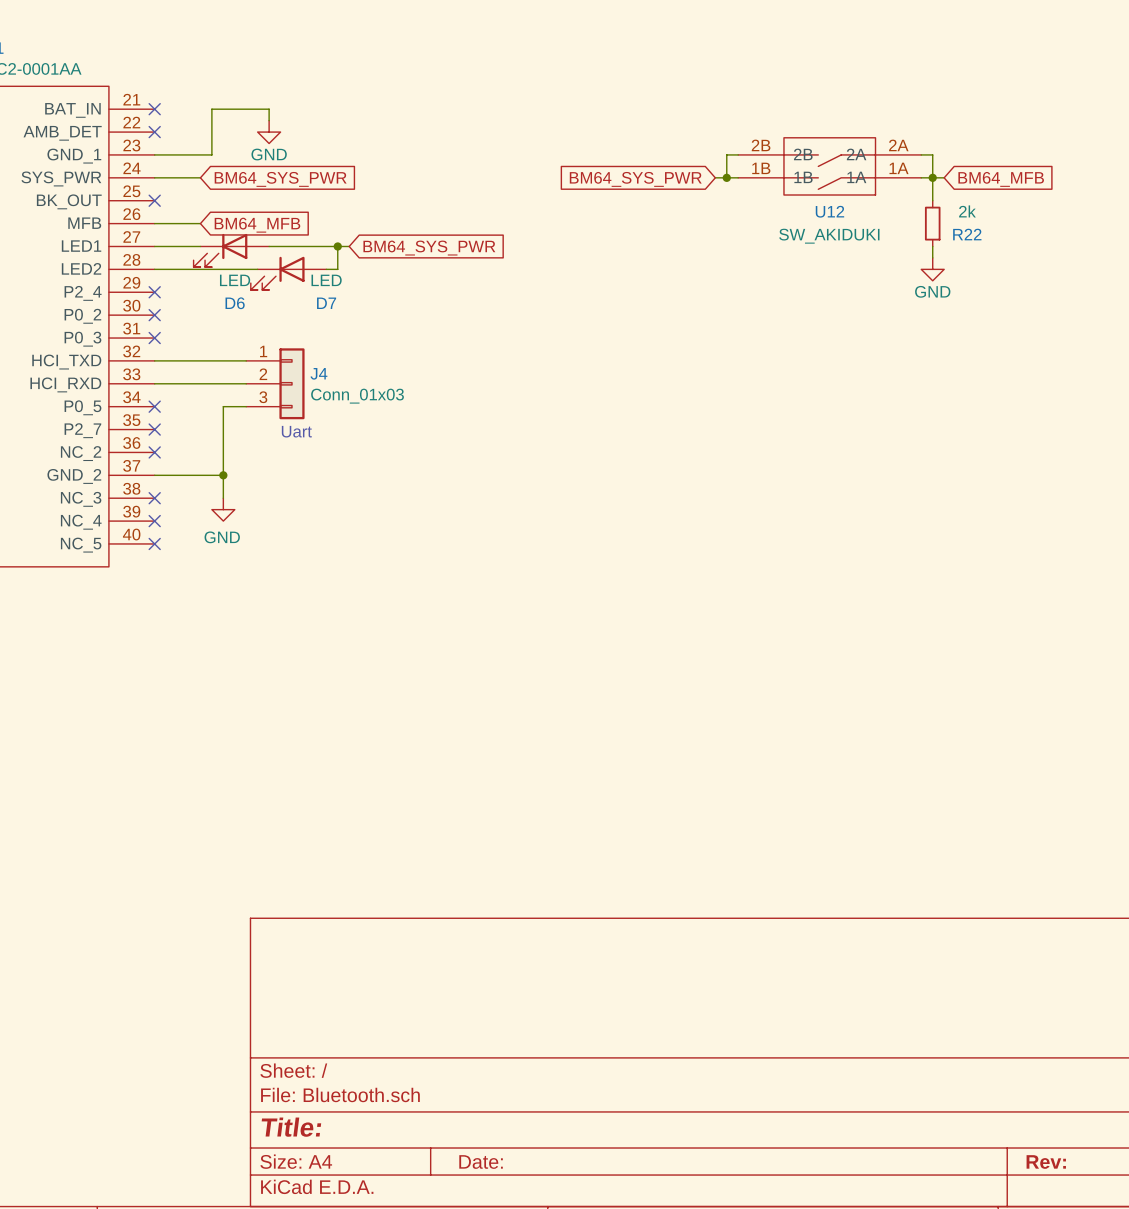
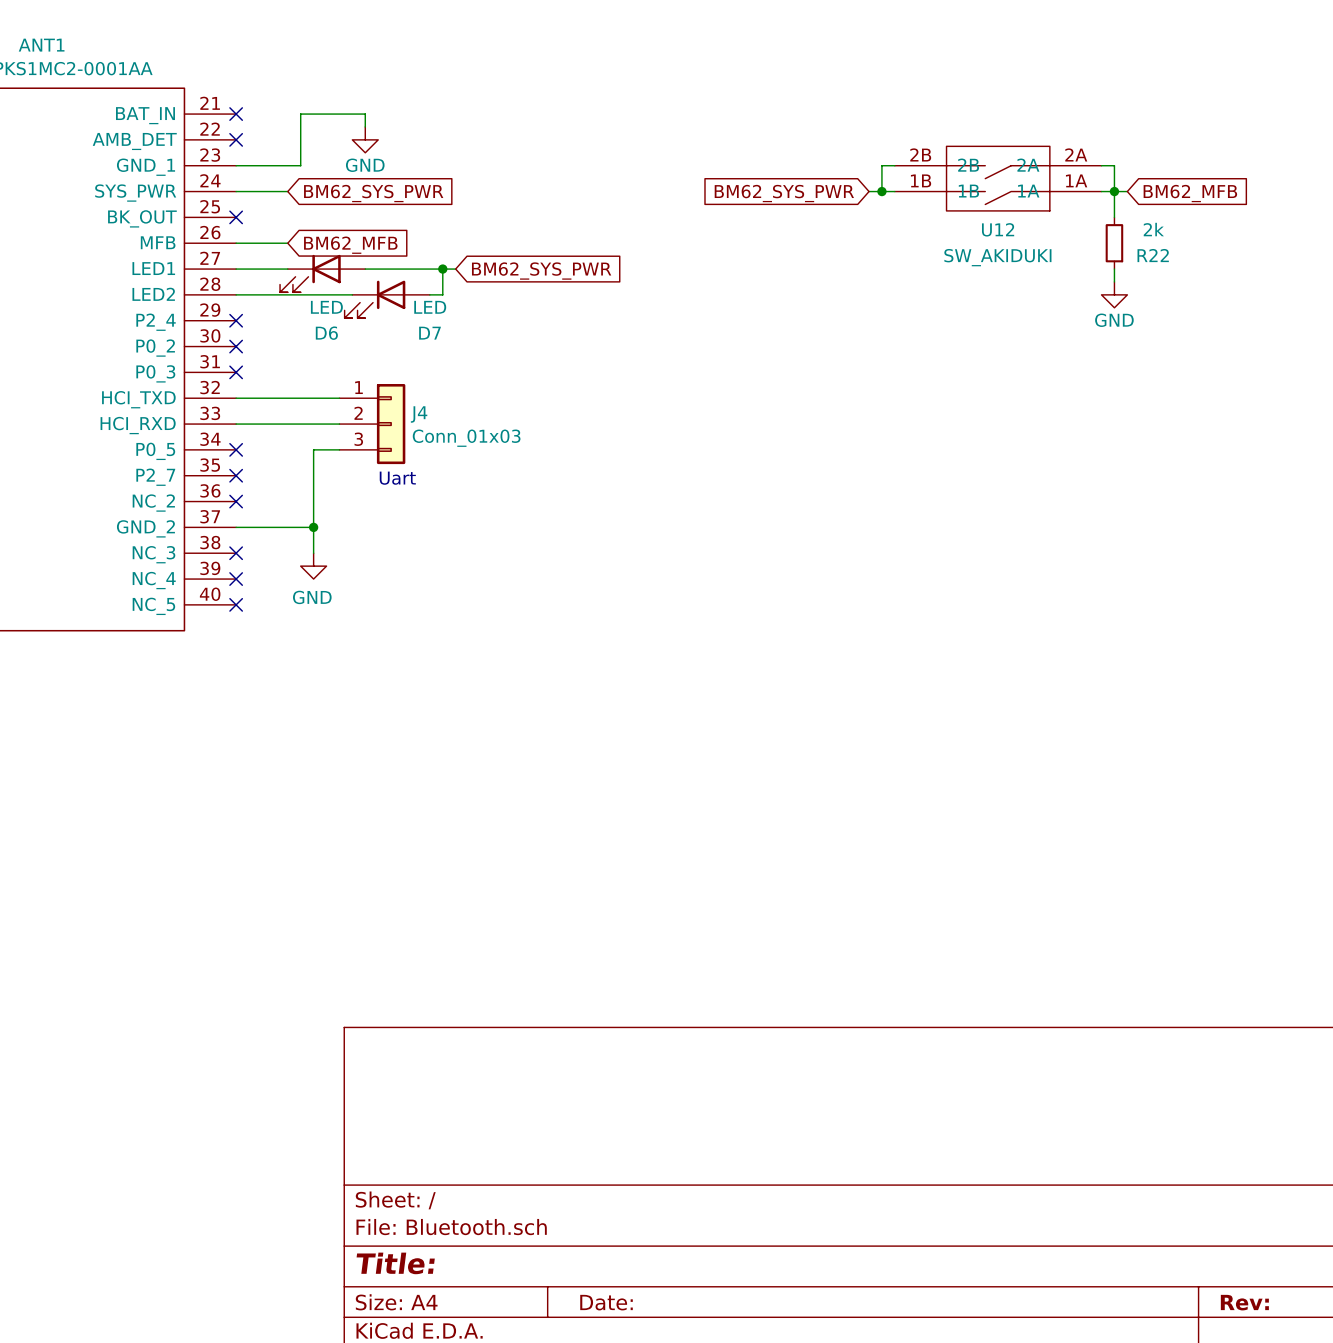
global label: BM64_SYS_PWR (280, 179) -> BM62_SYS_PWR (373, 193)
global label: BM64_SYS_PWR (635, 179) -> BM62_SYS_PWR (784, 193)
global label: BM64_MFB (1001, 179) -> BM62_MFB (1190, 193)
global label: BM64_MFB (257, 225) -> BM62_MFB (350, 245)
global label: BM64_SYS_PWR (429, 248) -> BM62_SYS_PWR (541, 271)

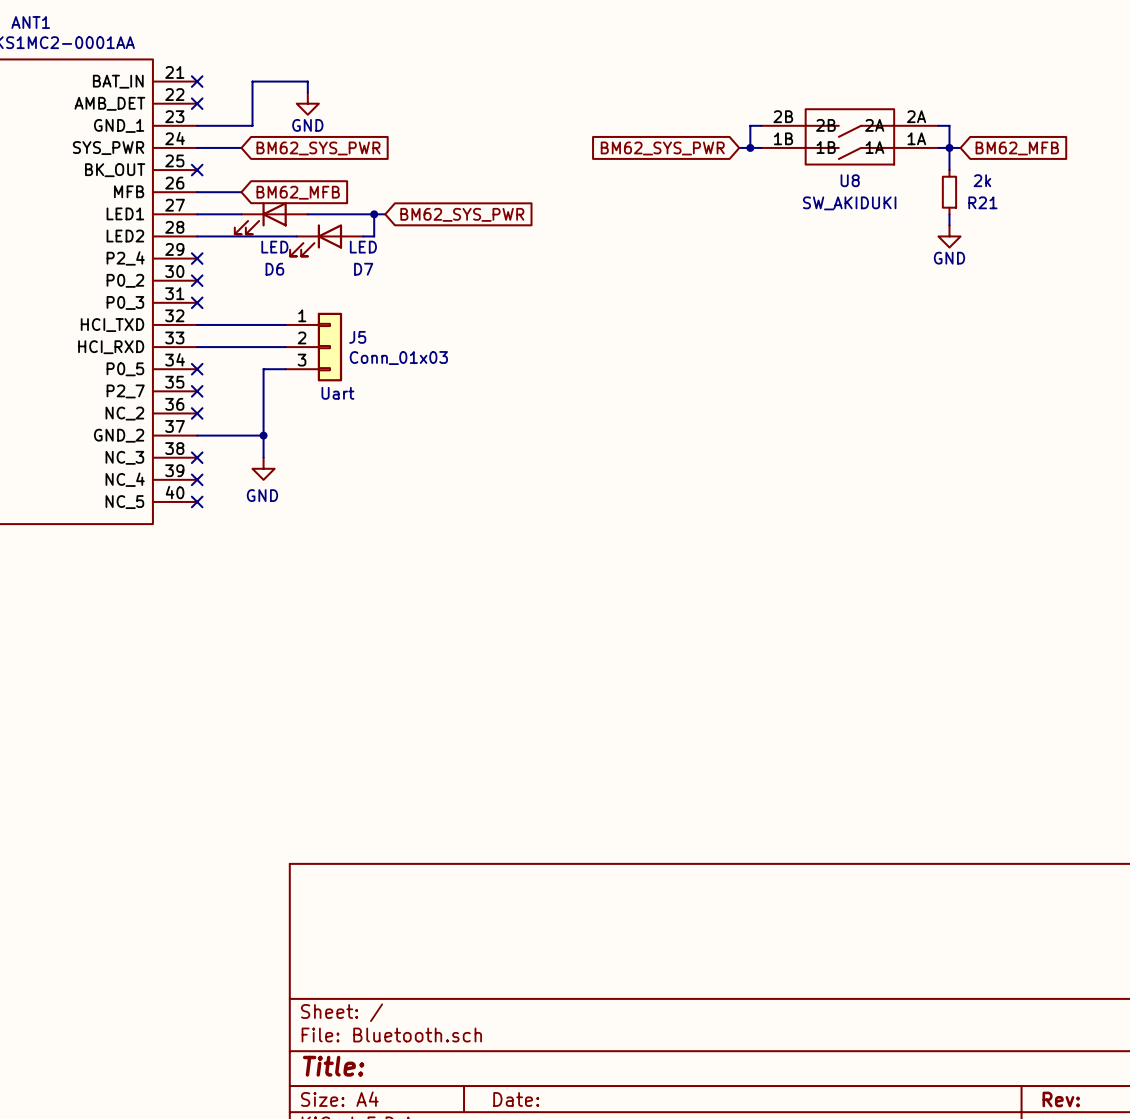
U12 name: U12 (998, 229) -> U8 (850, 180)
R22 name: R22 (1153, 255) -> R21 (982, 202)
J4 name: J4 (419, 414) -> J5 (357, 337)

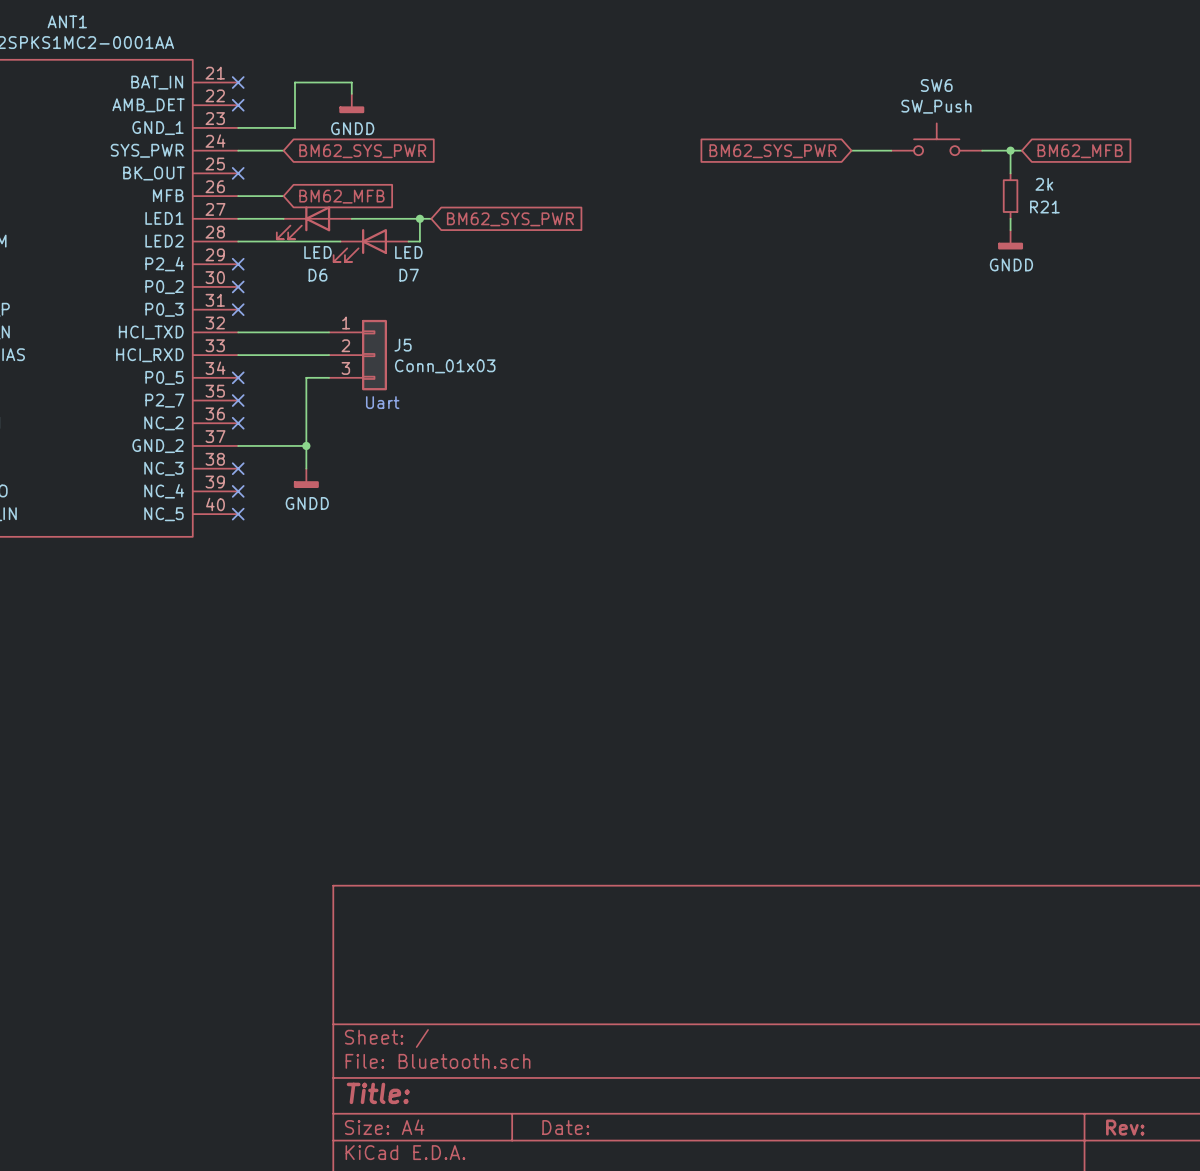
power symbol: GND (307, 103) -> GNDD (351, 103)
wire: (761, 125) (750, 125) (750, 147) -> none
wire: (938, 125) (949, 125) (949, 147) -> none
U8: SW_AKIDUKI (849, 136) -> none
SW6: none -> SW_Push (936, 139)
wire: (739, 147) (761, 147) -> none
junction: (750, 147) -> none
global label position: BM62_SYS_PWR (662, 148) -> BM62_SYS_PWR (772, 151)
power symbol: GND (949, 236) -> GNDD (1010, 239)
power symbol: GND (263, 468) -> GNDD (306, 478)

